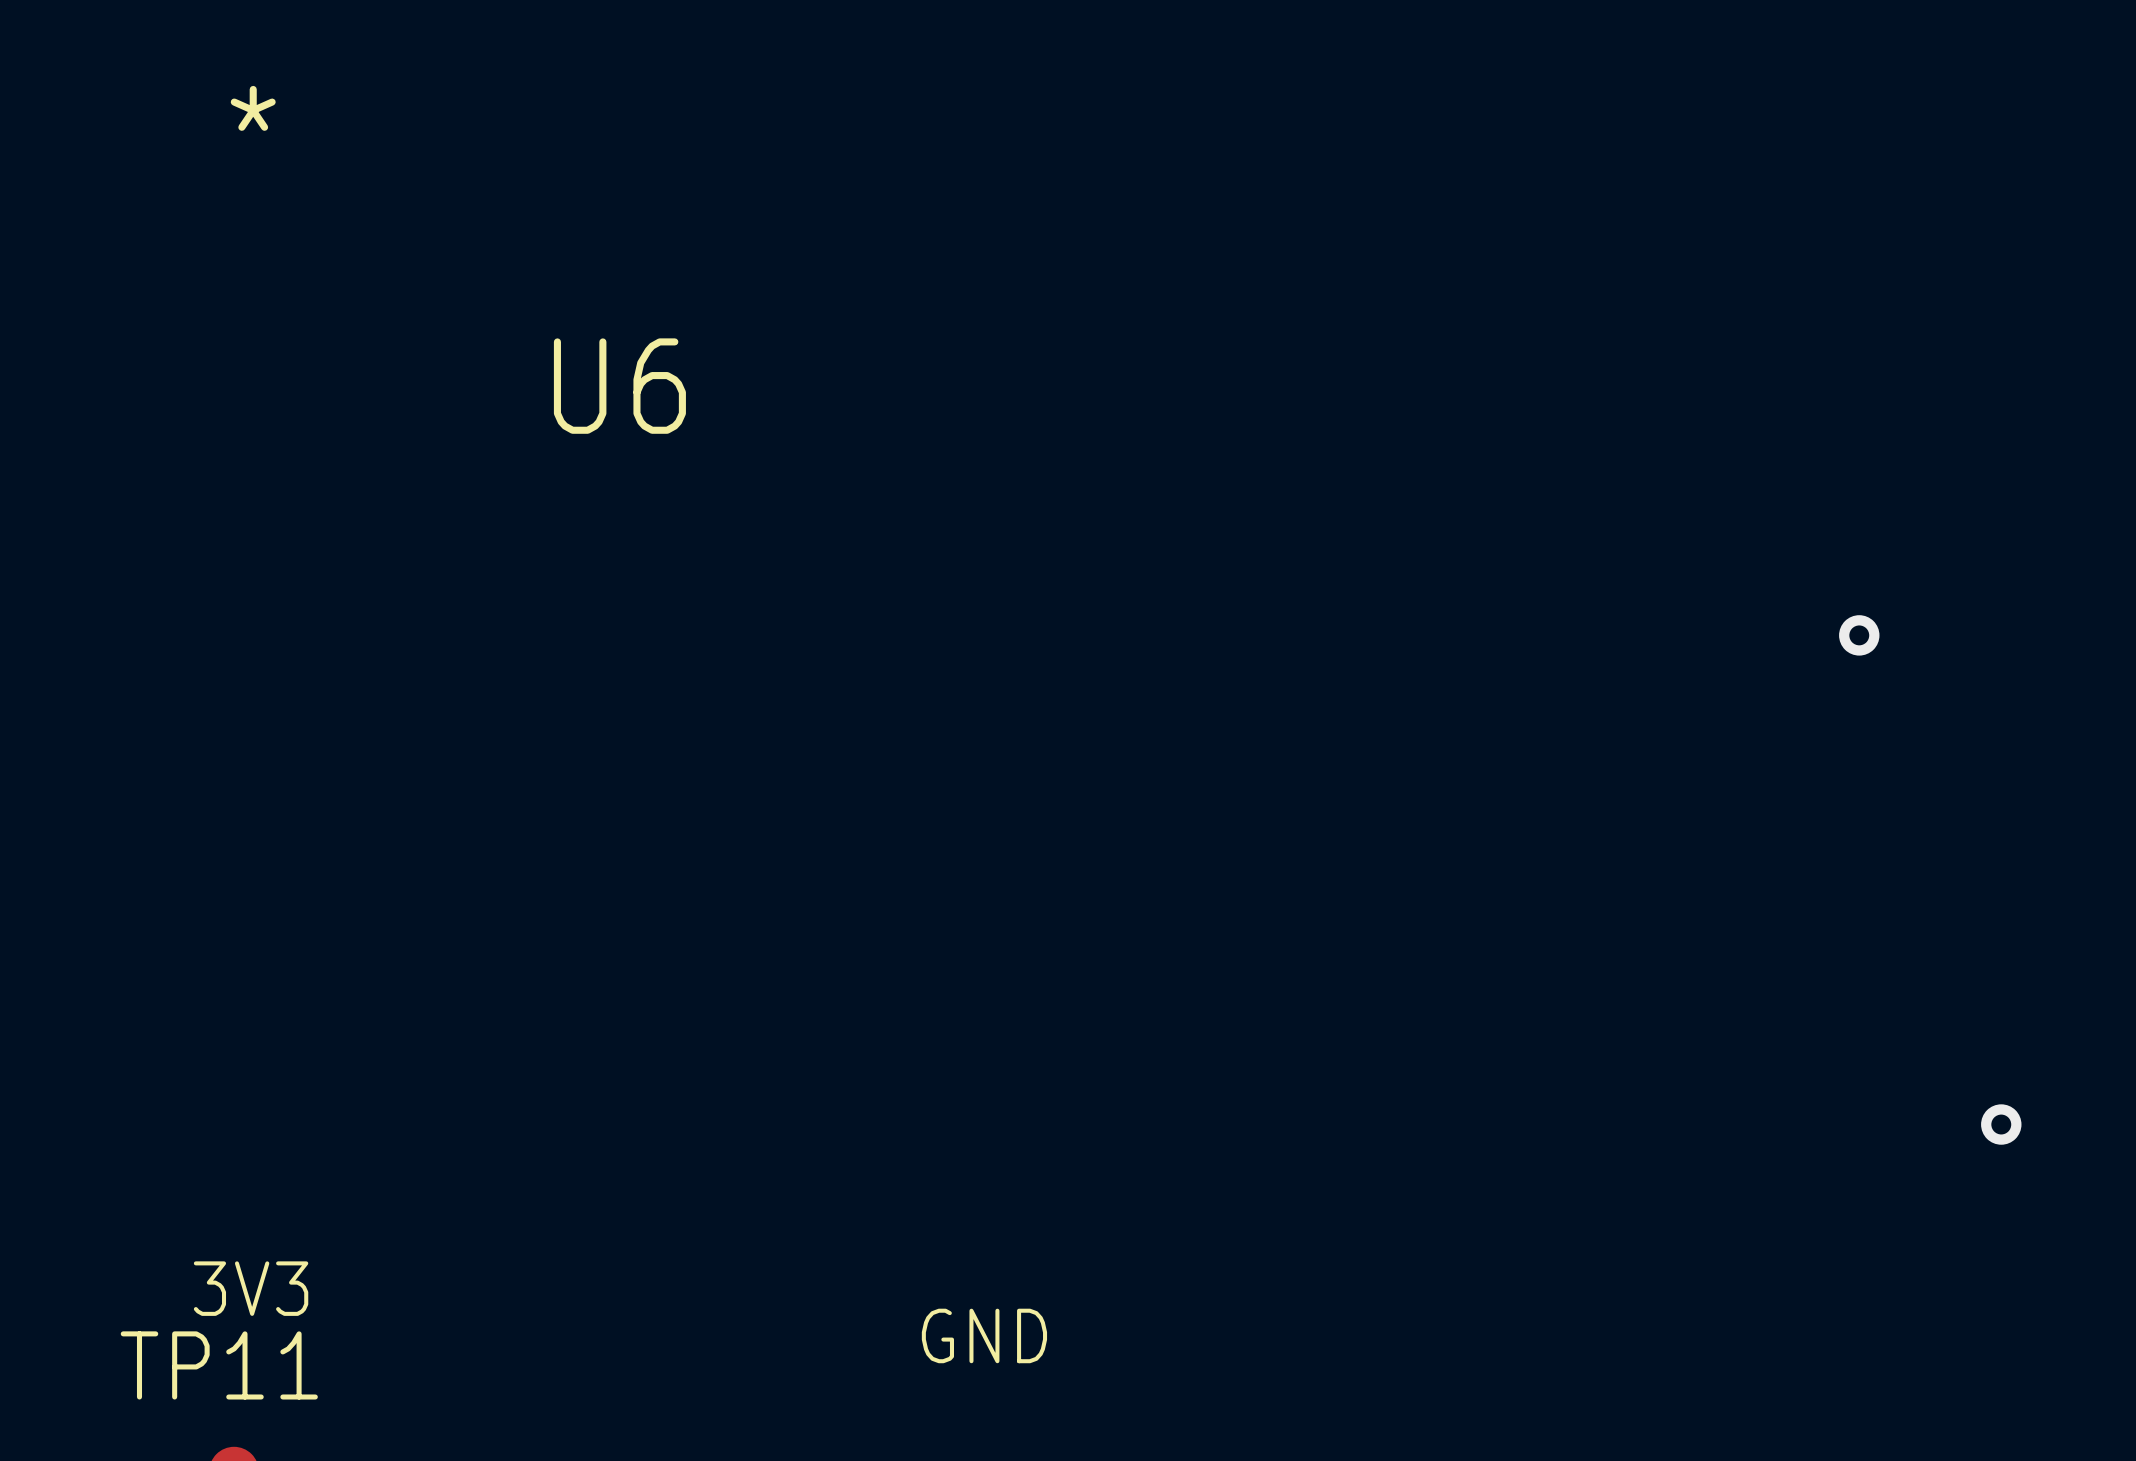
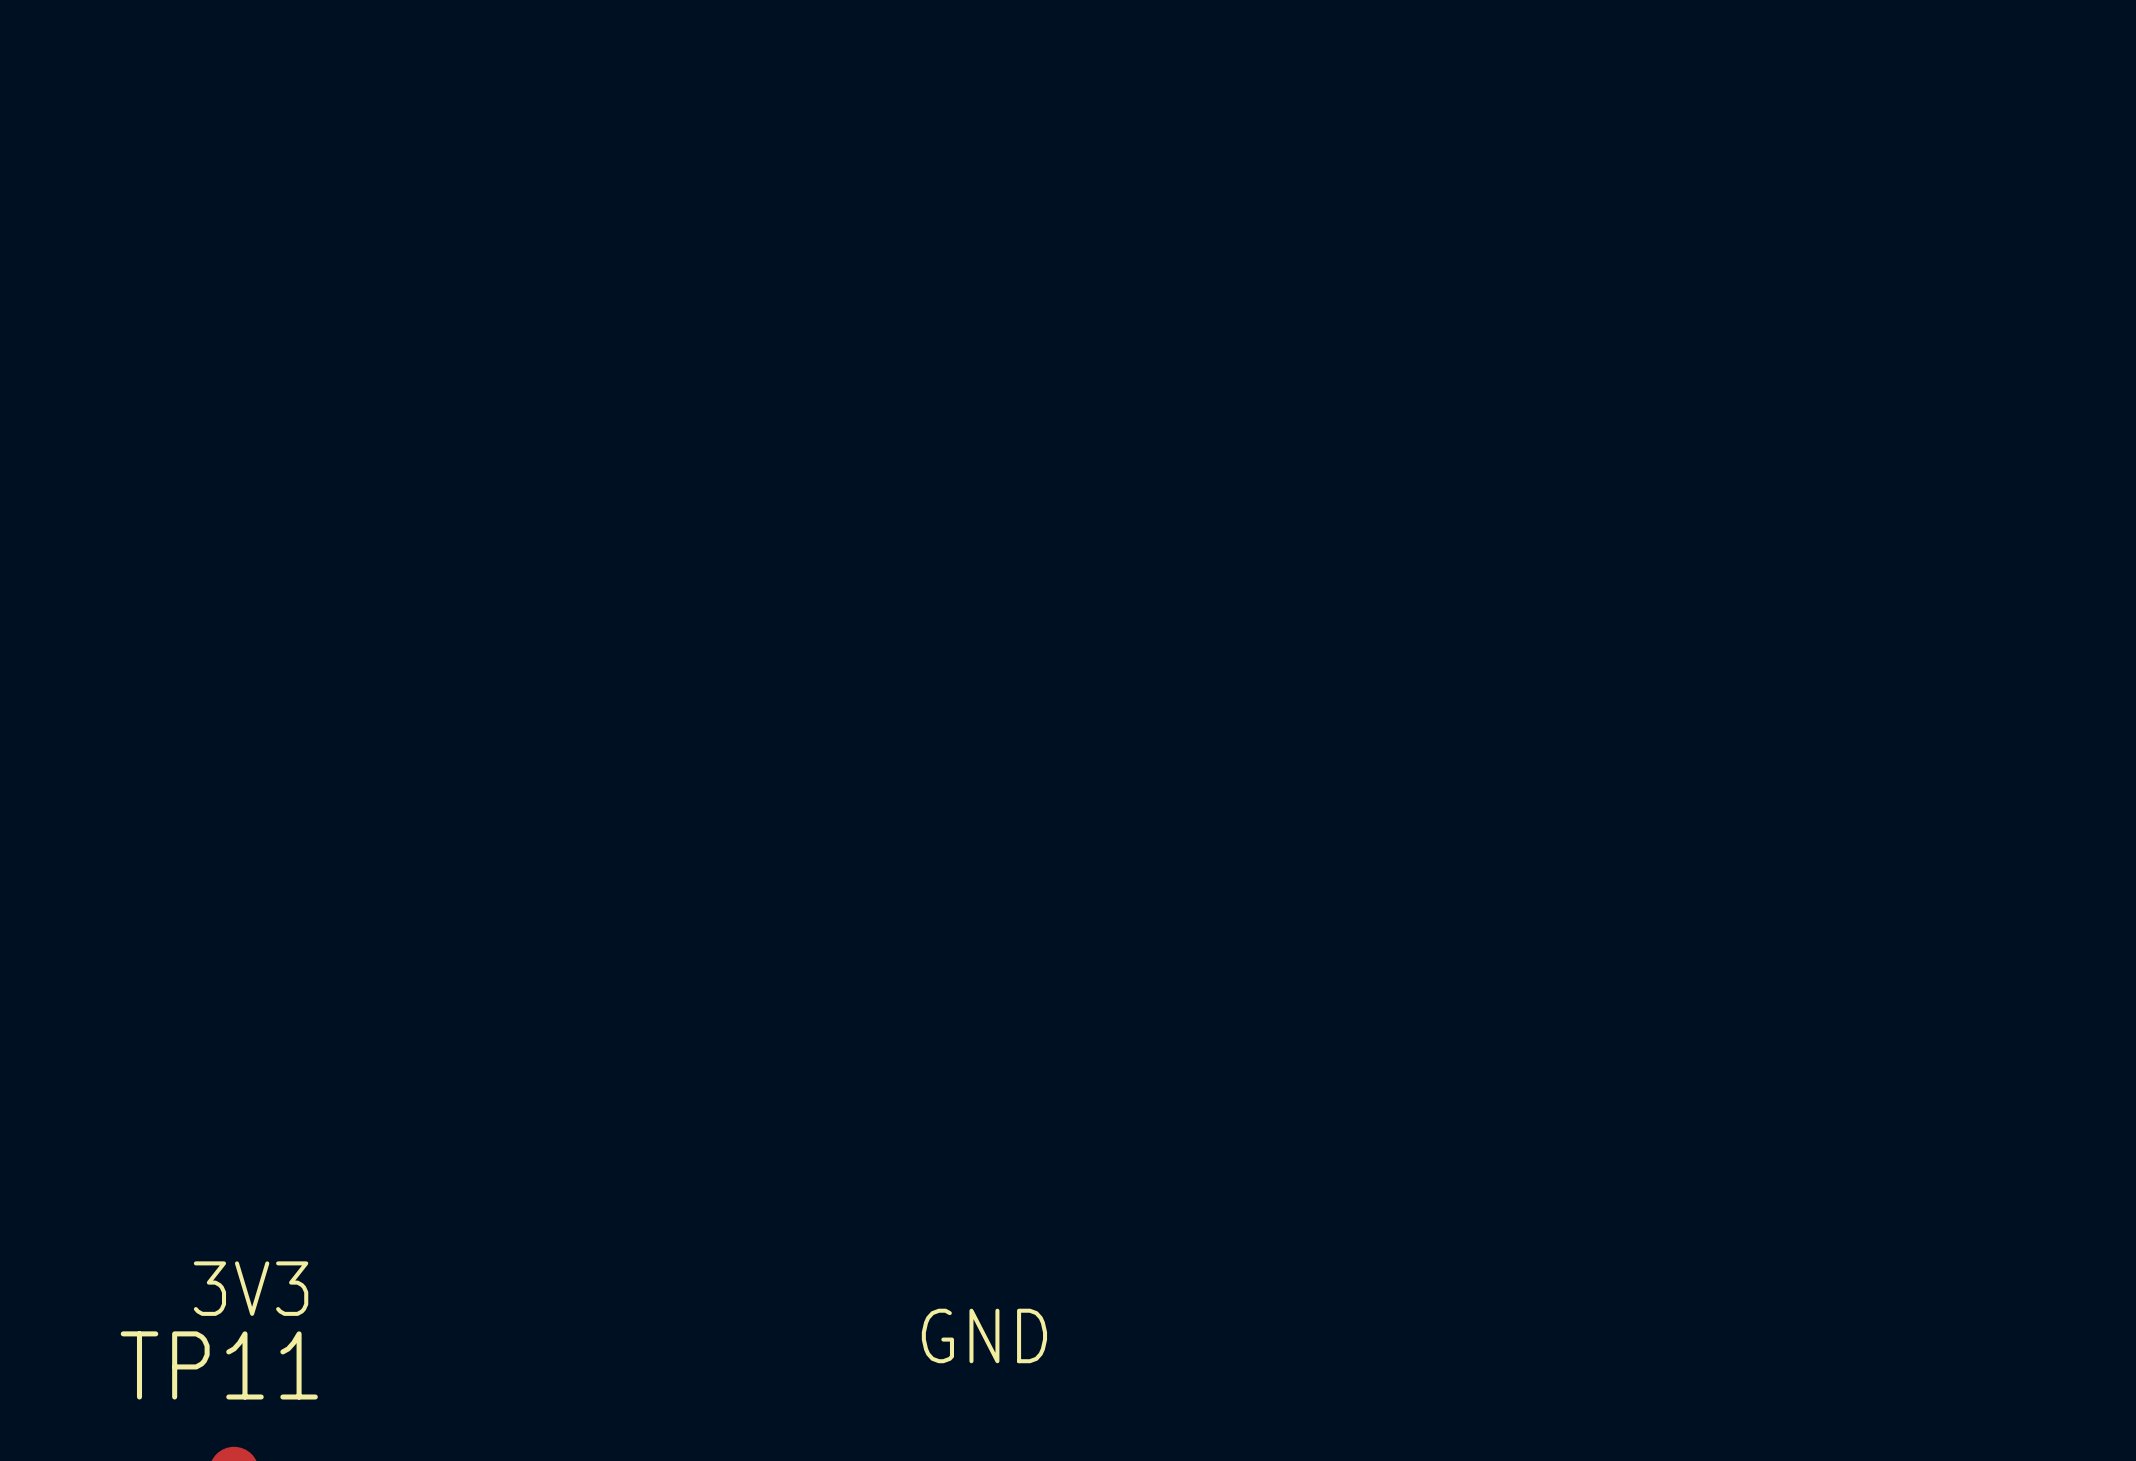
text: * (253, 108) -> none
text: U6 (619, 386) -> none
via: (1859, 635) -> none
via: (2001, 1124) -> none

